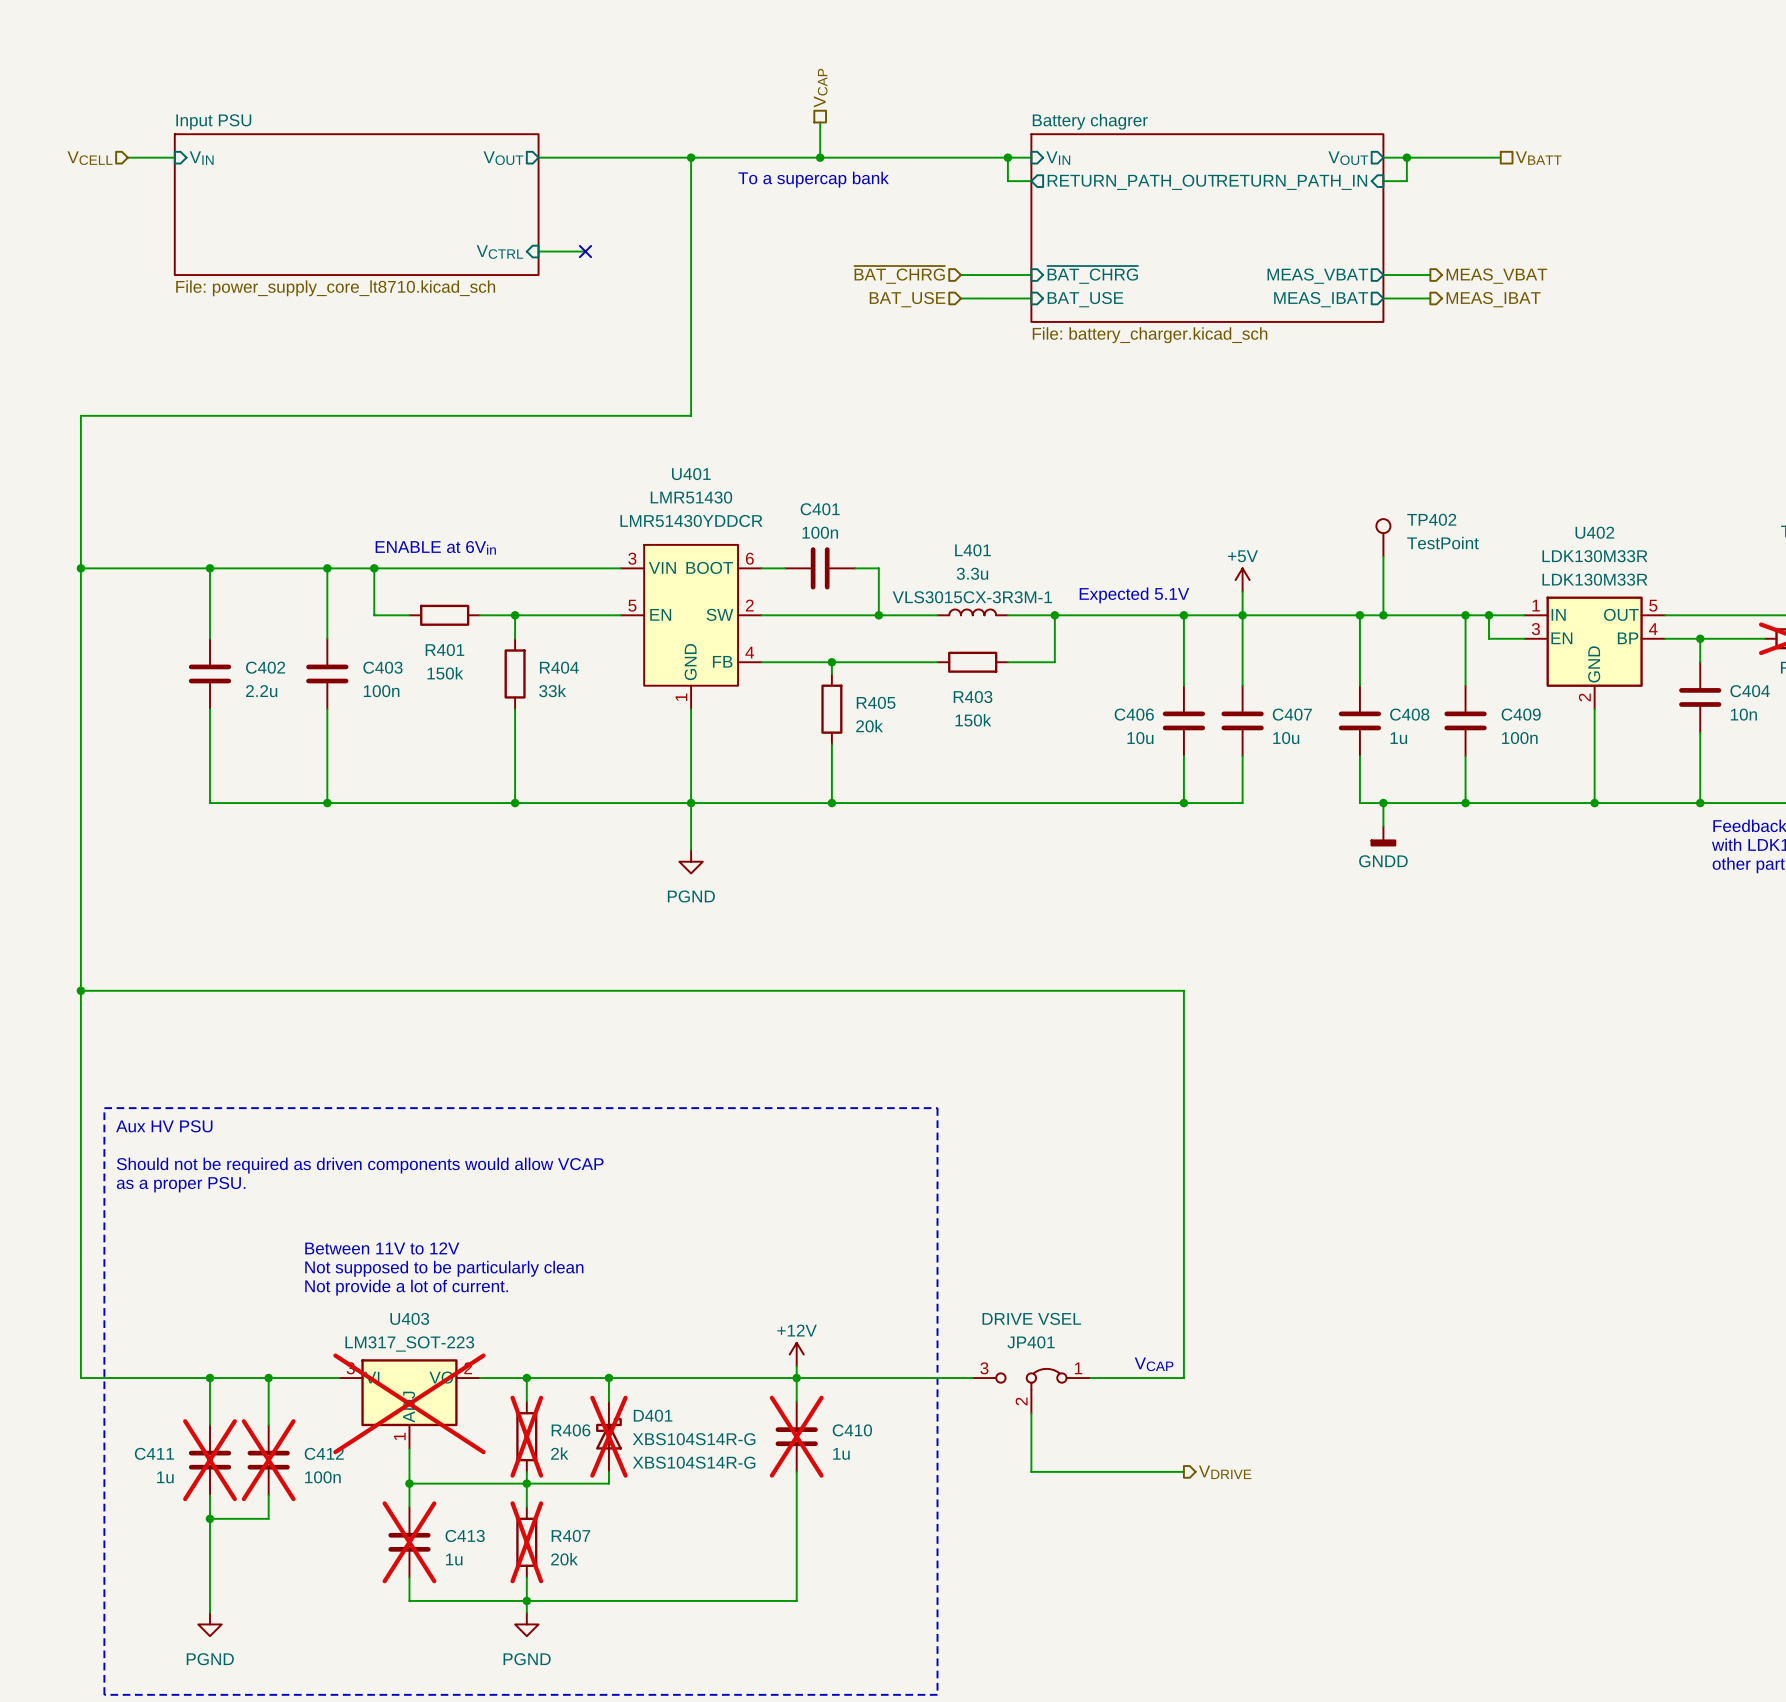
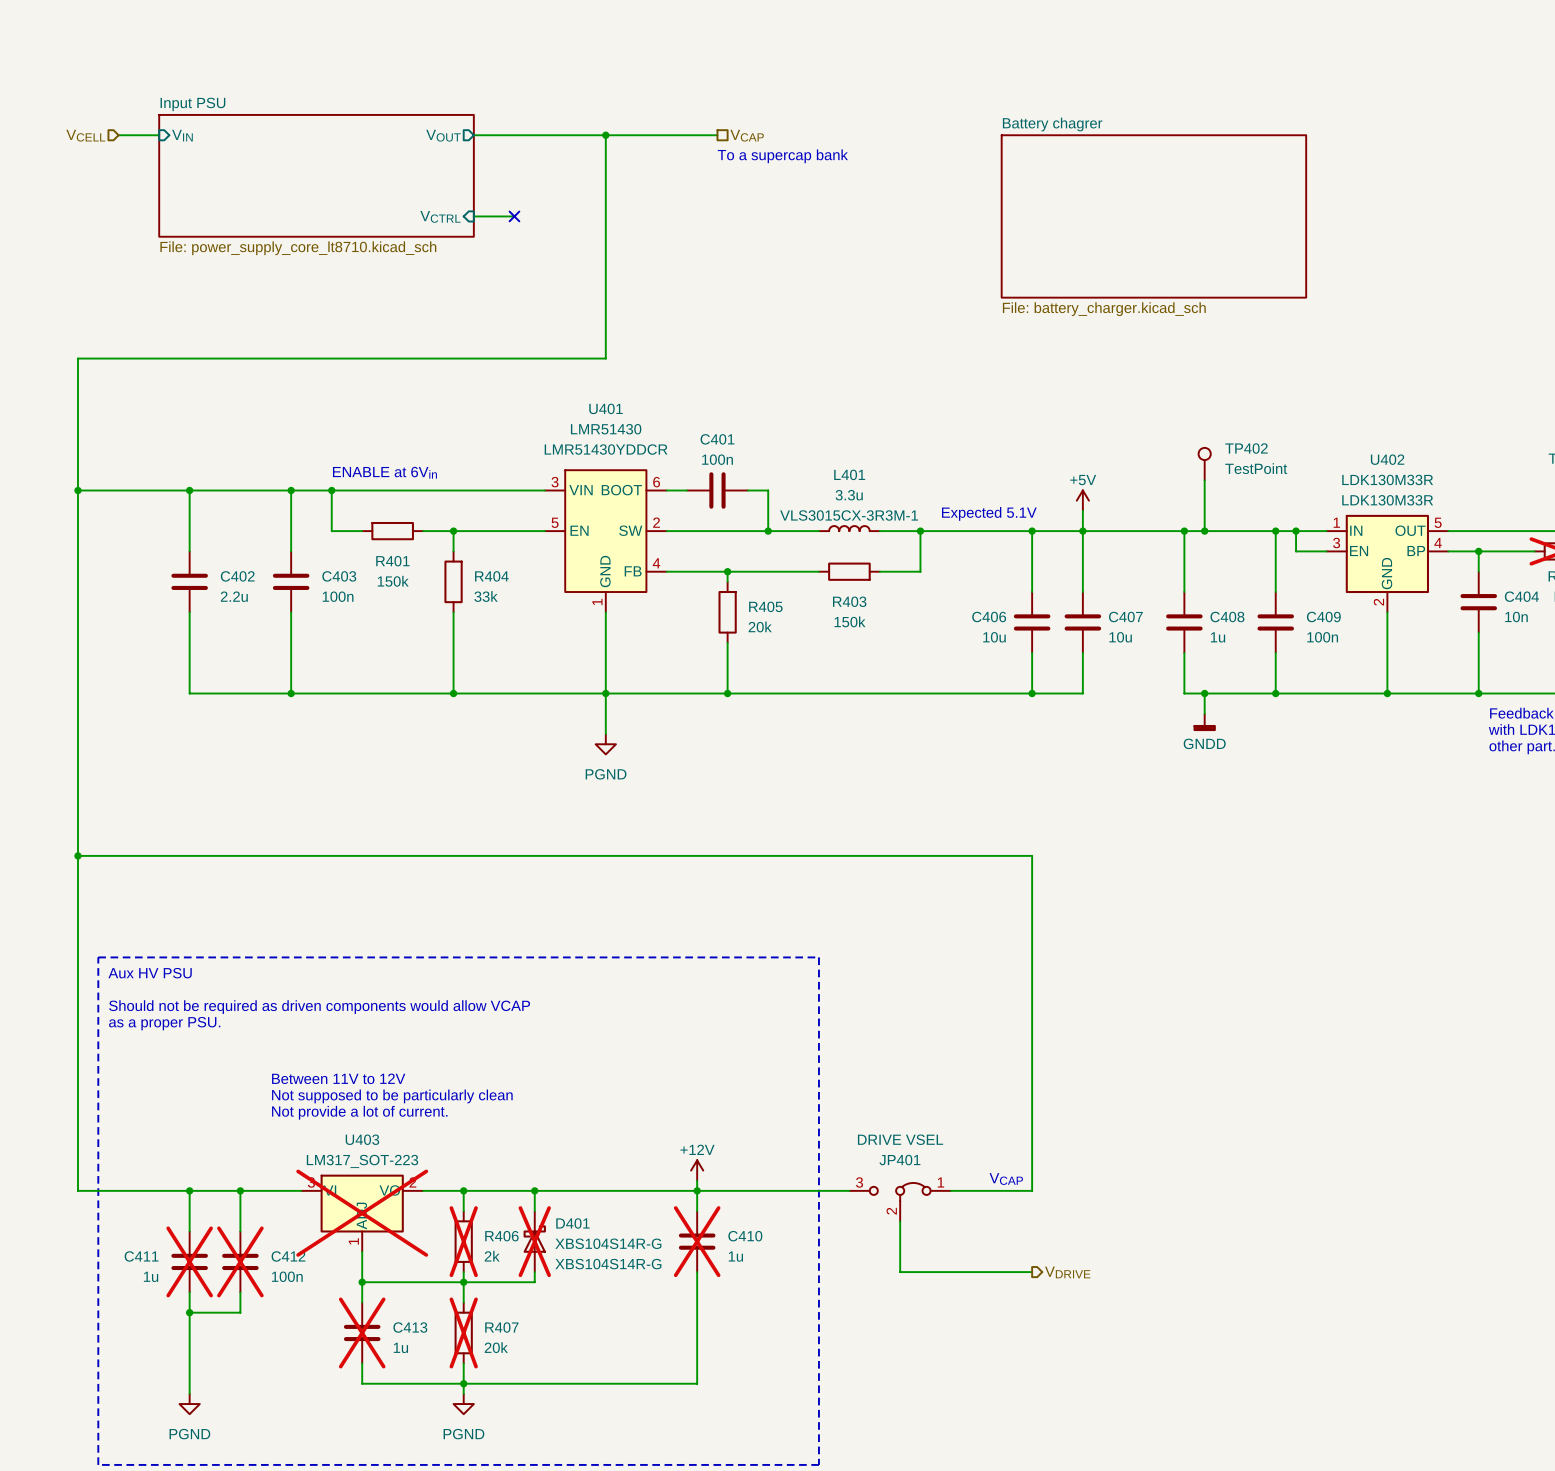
hierarchical label rotation: 0° (820, 88) -> 90° clockwise (747, 135)
hierarchical label position: VCAP (820, 88) -> VCAP (747, 135)
wire: (820, 122) (820, 157) (1031, 157) -> none
junction: (820, 157) -> none
wire: (1007, 157) (1007, 181) (1031, 181) -> none
junction: (1007, 157) -> none
wire: (1406, 157) (1406, 181) (1383, 181) -> none
junction: (1406, 157) -> none
sheet pin: VIN (1058, 158) -> none
sheet pin: VOUT (1348, 158) -> none
hierarchical label: VBATT (1538, 158) -> none
text position: To a supercap bank (813, 179) -> To a supercap bank (782, 156)
sheet pin: RETURN_PATH_OUT (1132, 182) -> none
sheet pin: RETURN_PATH_IN (1292, 182) -> none
sheet Battery chagrer position: (1207, 228) -> (1153, 216)
hierarchical label: ~{BAT_CHRG} (899, 274) -> none
sheet pin: ~{BAT_CHRG} (1092, 274) -> none
wire: (960, 275) (1031, 275) -> none
wire: (1383, 275) (1430, 275) -> none
sheet pin: MEAS_VBAT (1317, 276) -> none
hierarchical label: MEAS_VBAT (1496, 276) -> none
wire: (960, 298) (1031, 298) -> none
wire: (1383, 298) (1430, 298) -> none
hierarchical label: BAT_USE (907, 299) -> none
sheet pin: BAT_USE (1085, 299) -> none
sheet pin: MEAS_IBAT (1321, 299) -> none
hierarchical label: MEAS_IBAT (1493, 299) -> none

